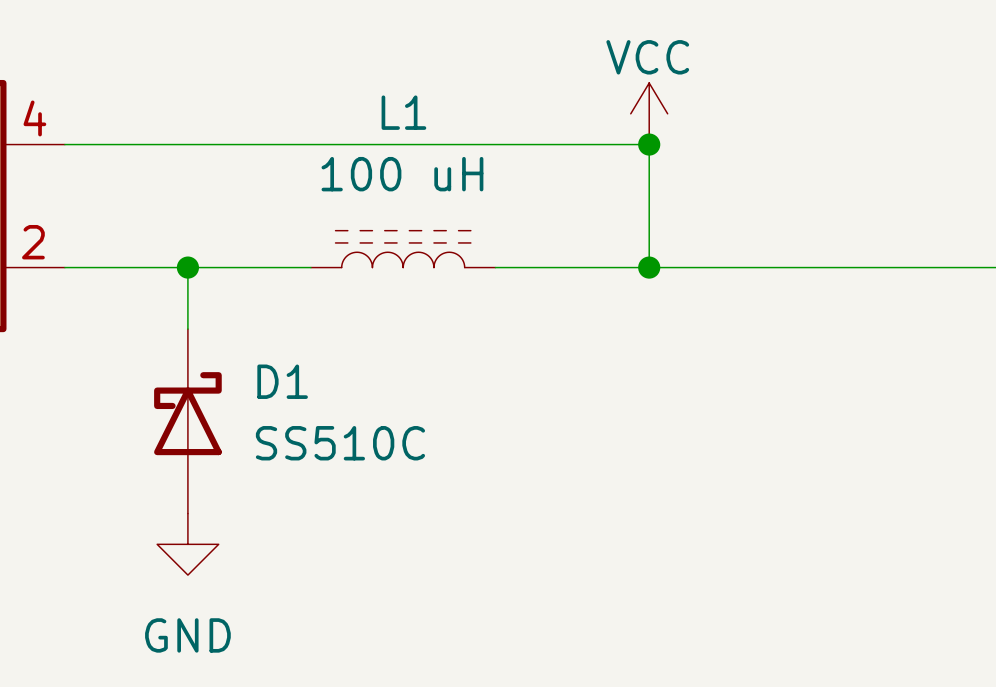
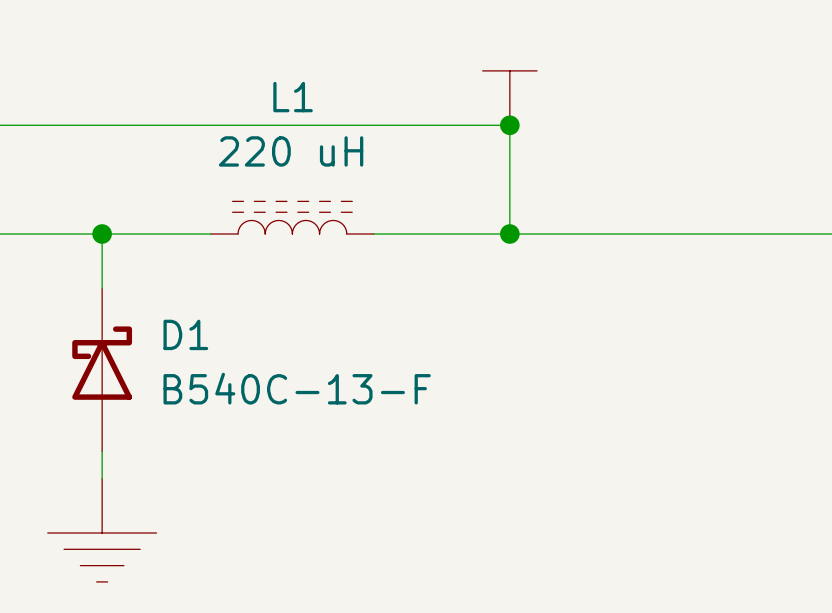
power symbol text: VCC (647, 57) -> none
power symbol shape: [630, 83, 668, 145] -> [482, 70, 538, 126]
L1 value: 100 uH (402, 174) -> 220 uH (291, 151)
D1 value: SS510C (340, 443) -> B540C-13-F (297, 388)
power symbol: GND (187, 544) -> none
power symbol: none -> (102, 530)

